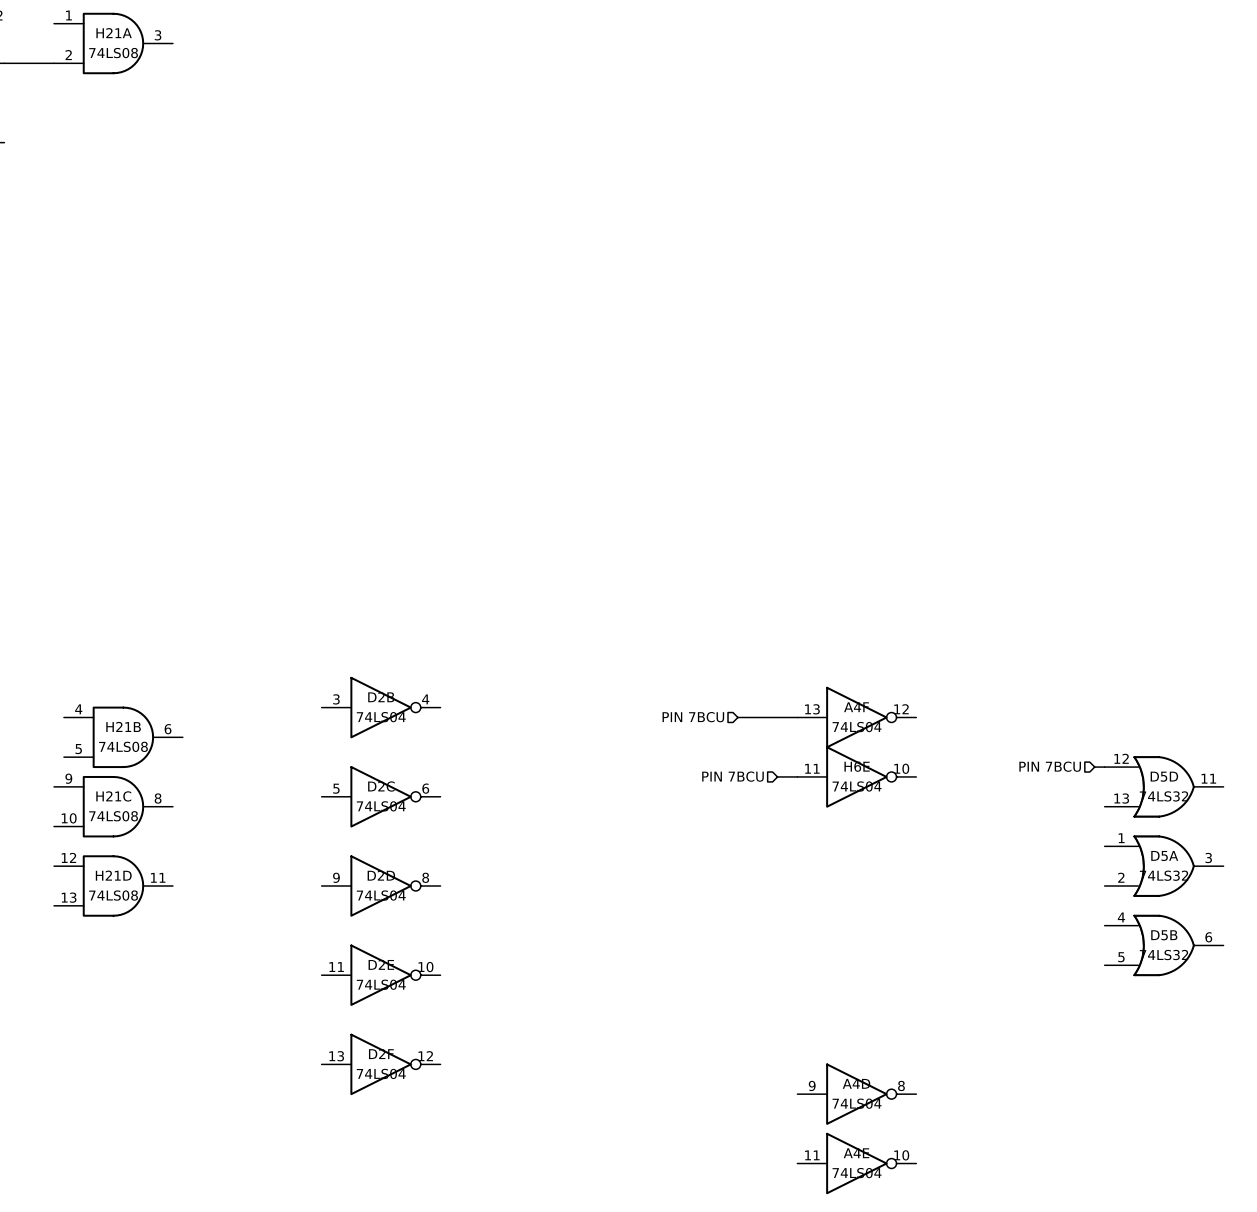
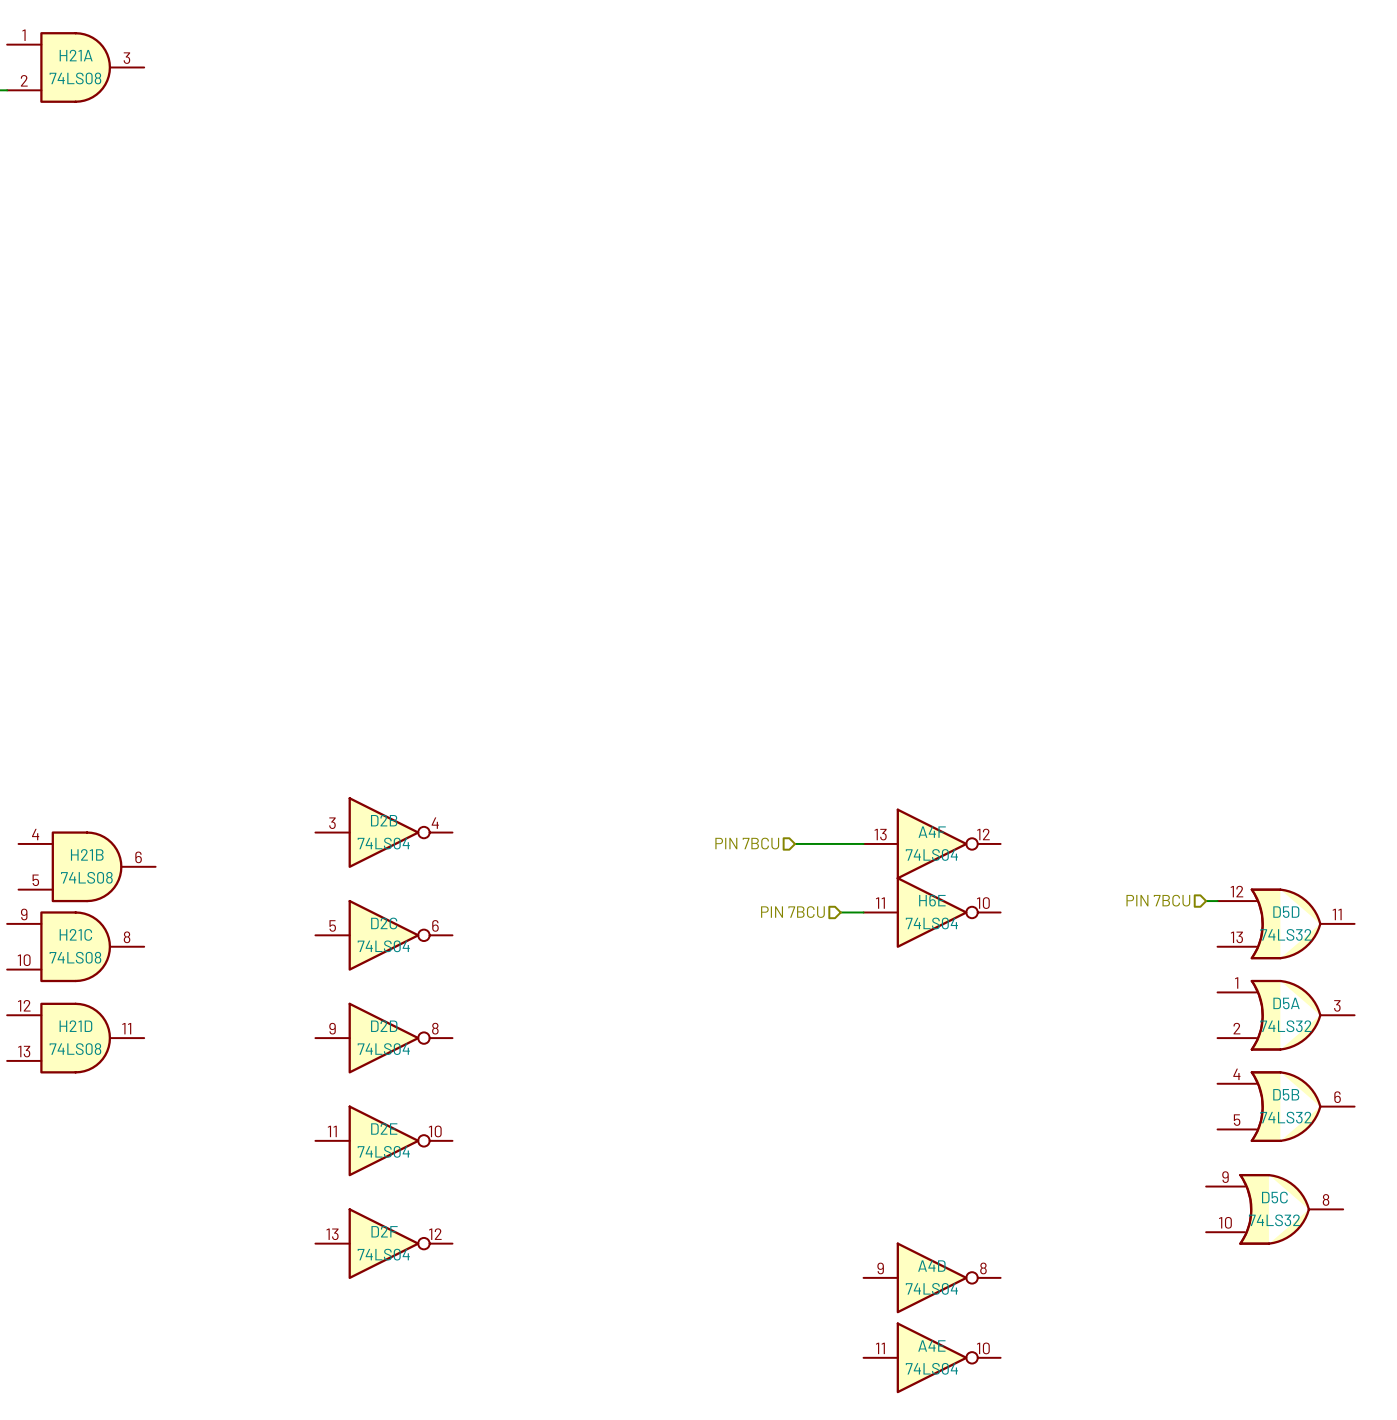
D5C: none -> 74LS32 (1274, 1209)

